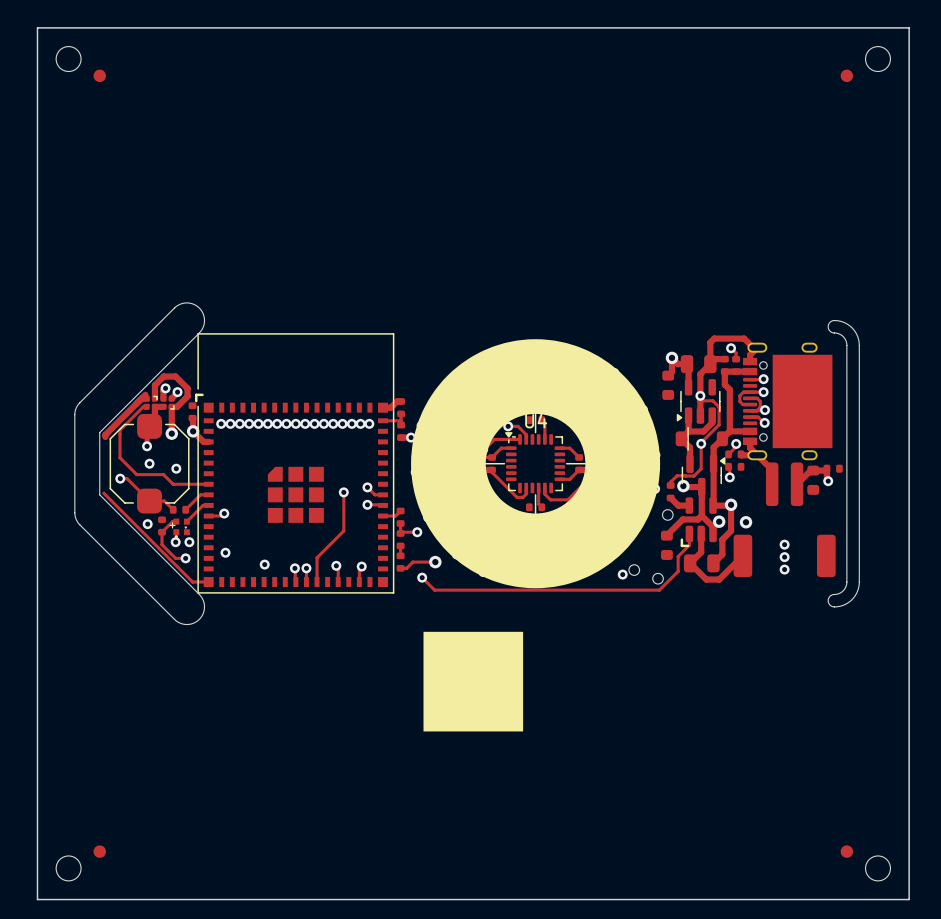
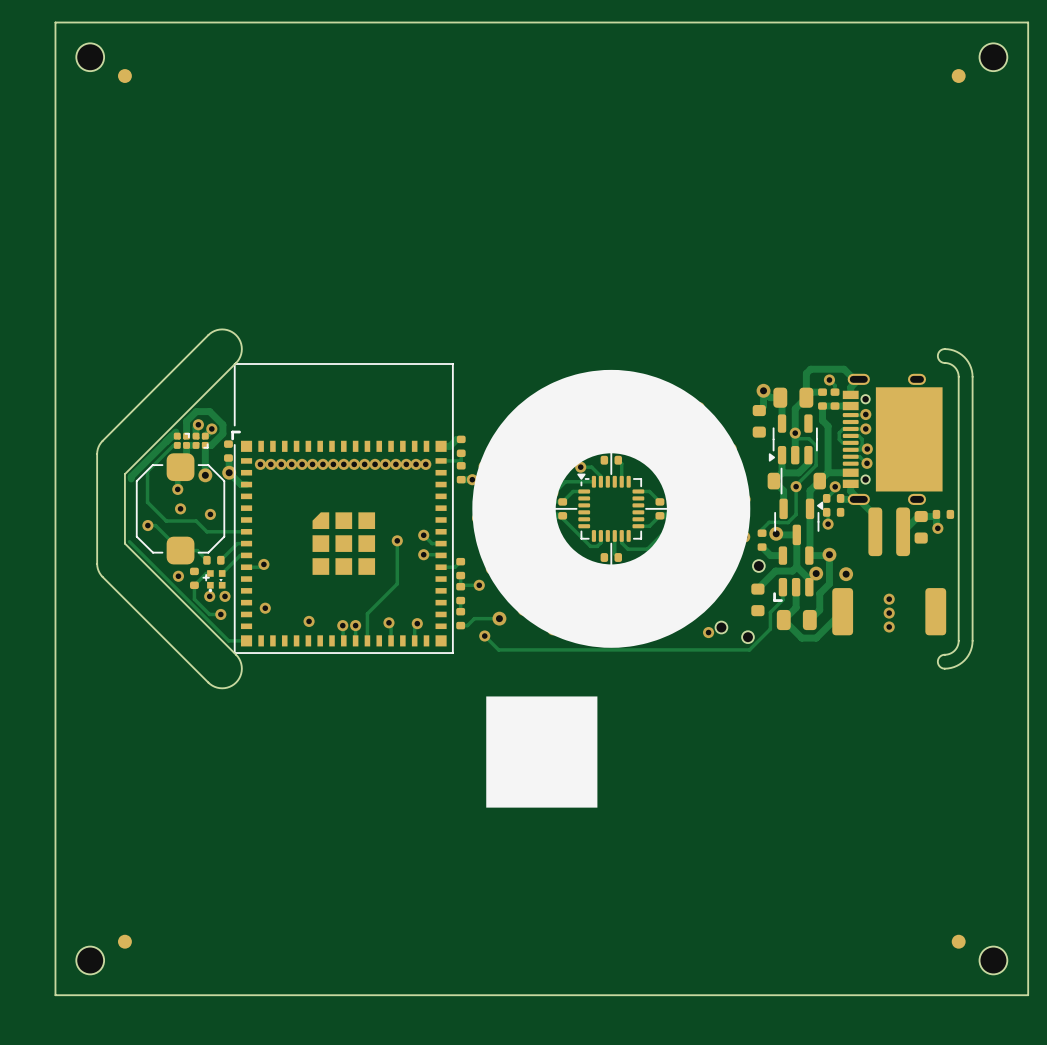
U4 name: U4 (536, 420) -> none

